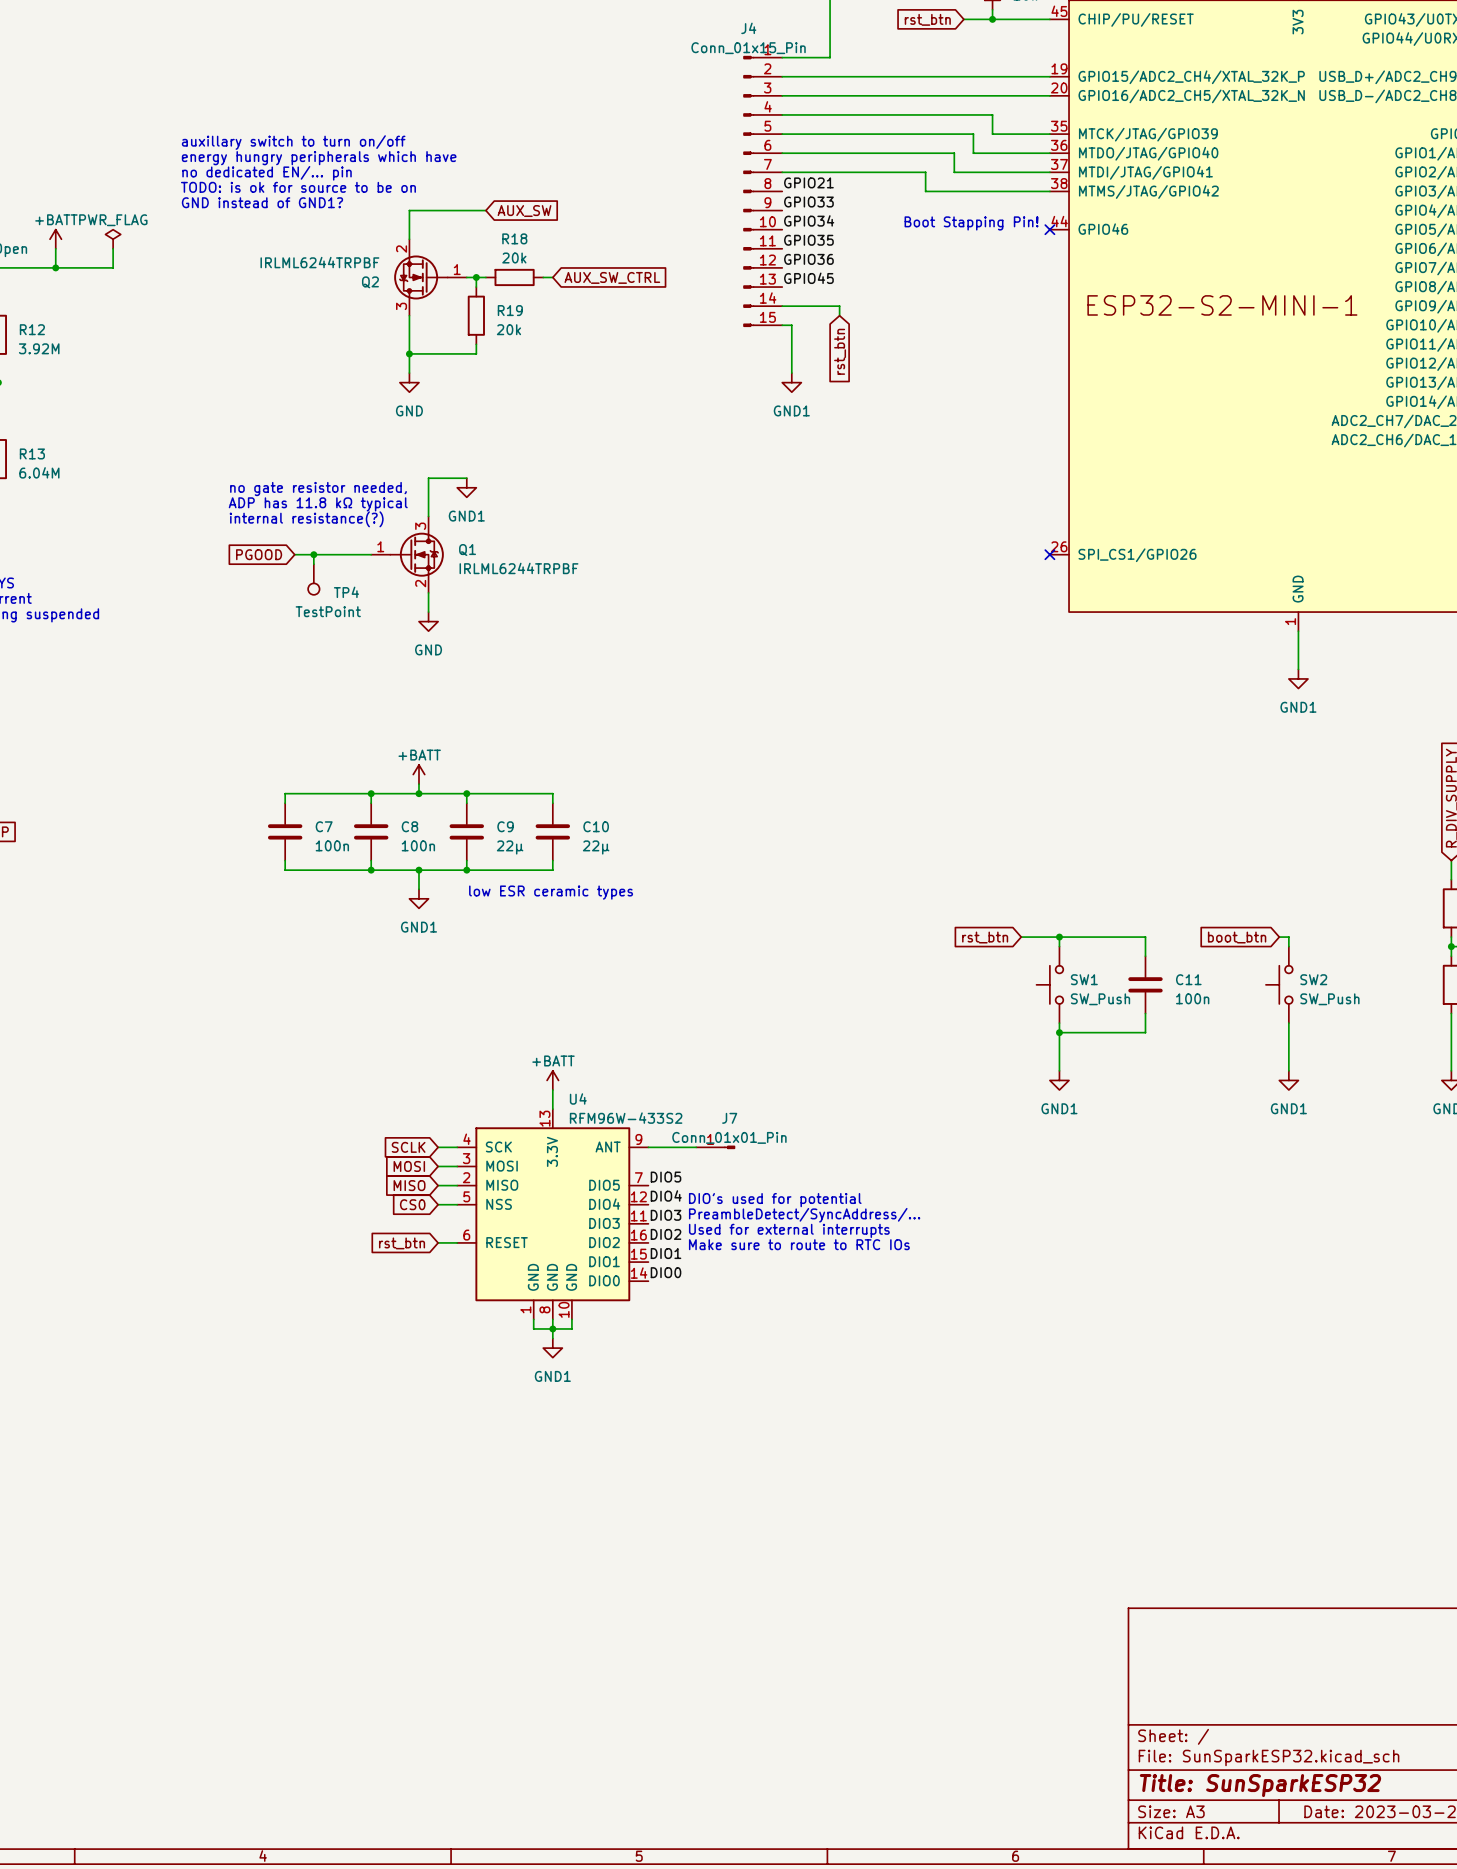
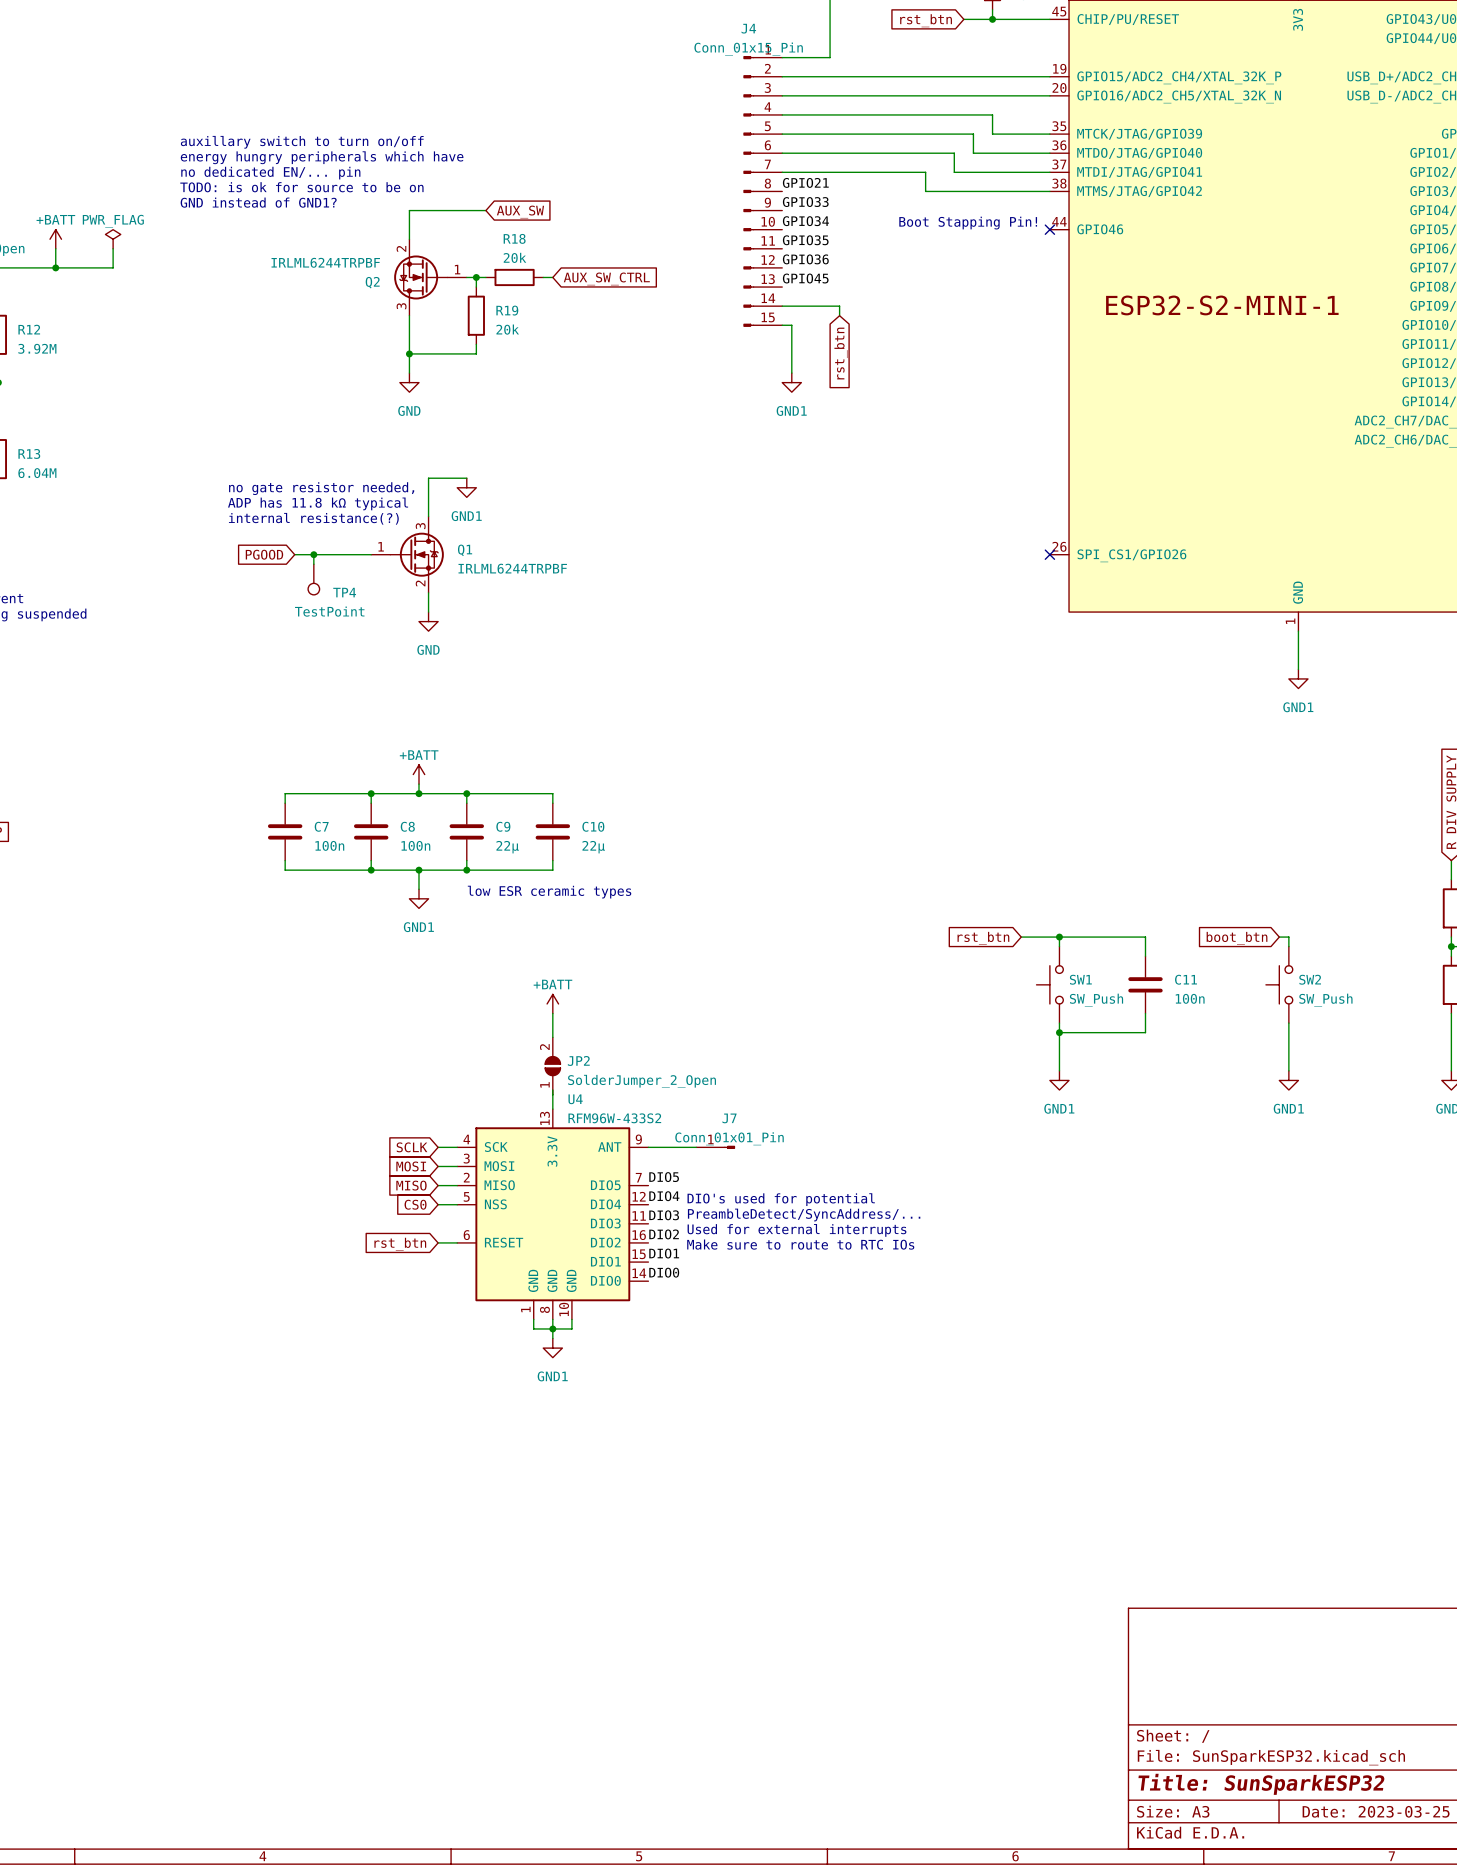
wire: none -> (552, 1013) (552, 1037)
JP2: none -> SolderJumper_2_Open (552, 1066)
power symbol position: +BATT (552, 1080) -> +BATT (552, 1003)

